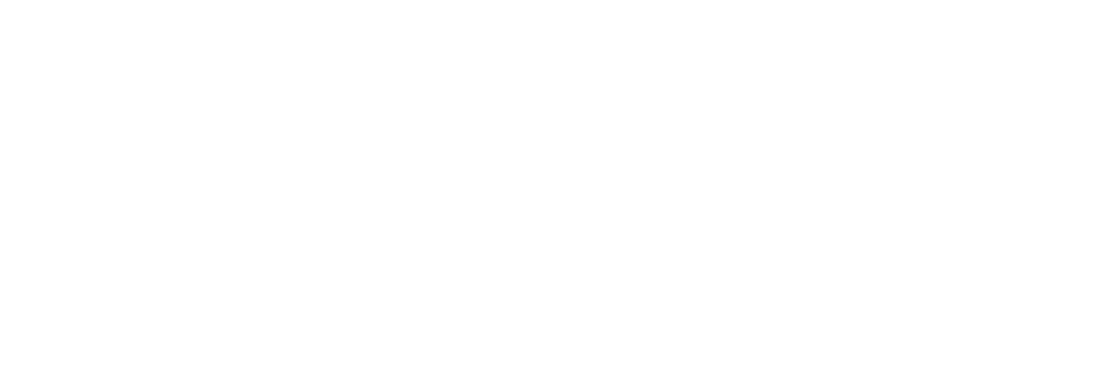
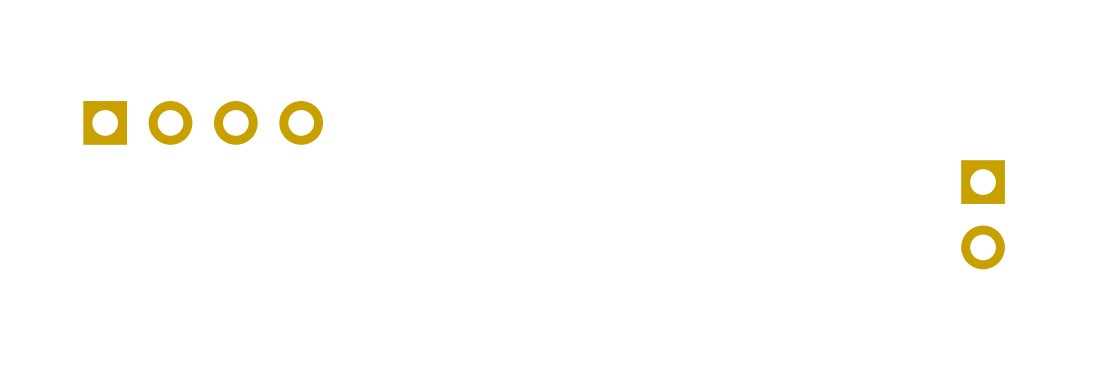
part: none -> (203, 122)
part: none -> (983, 214)

